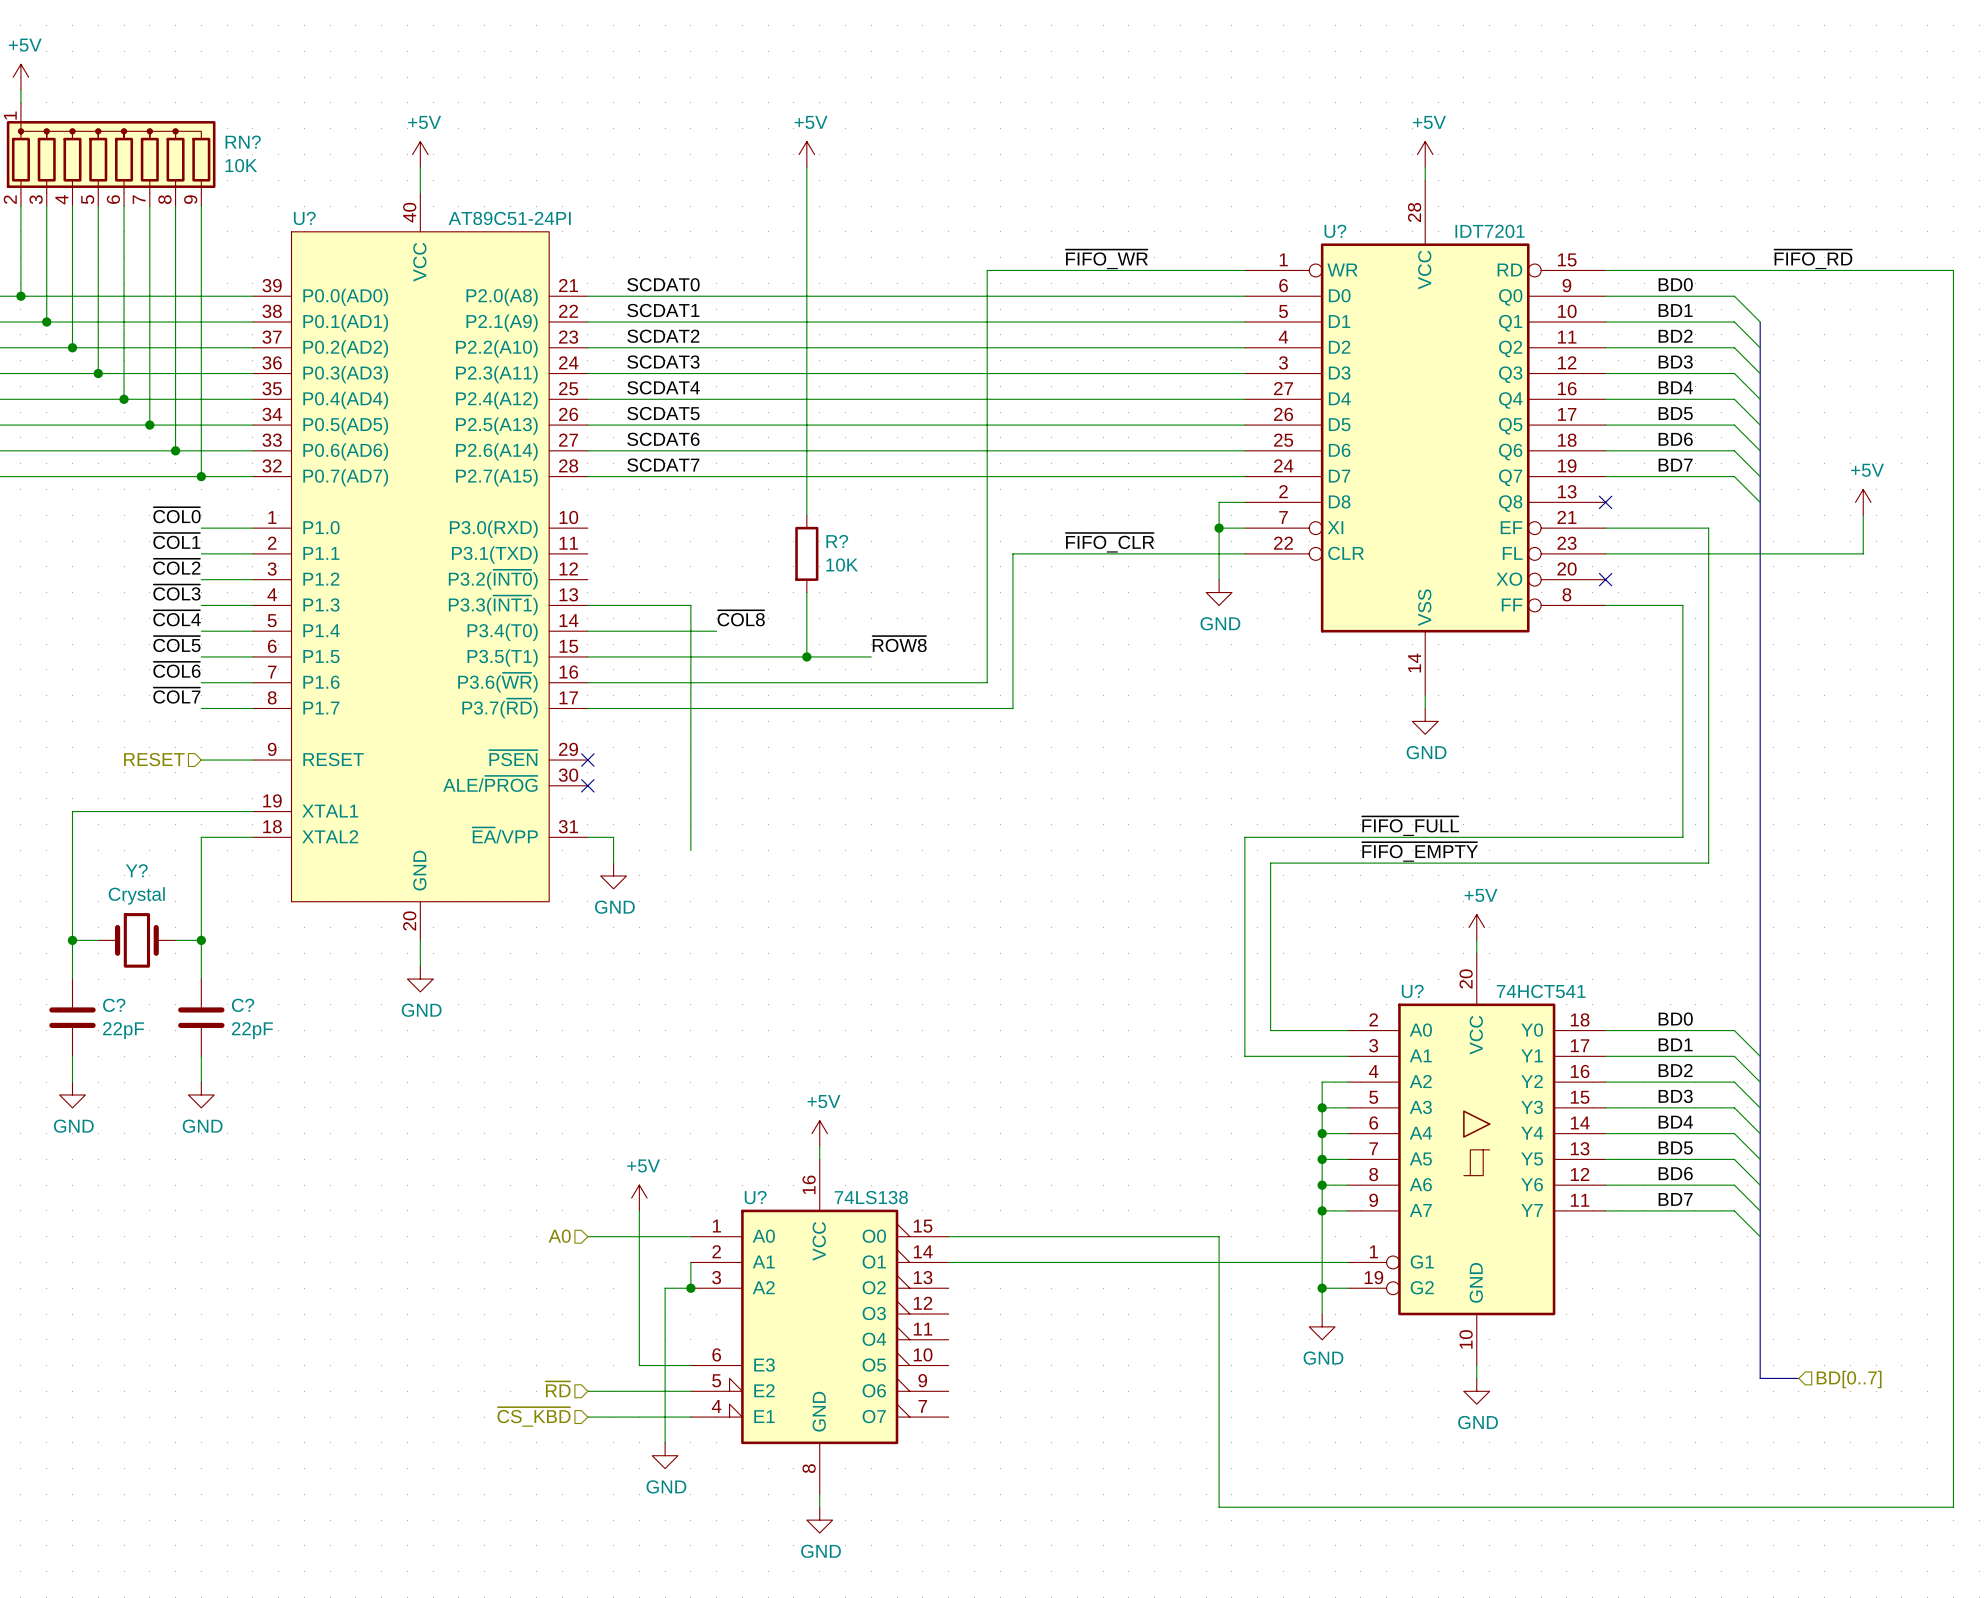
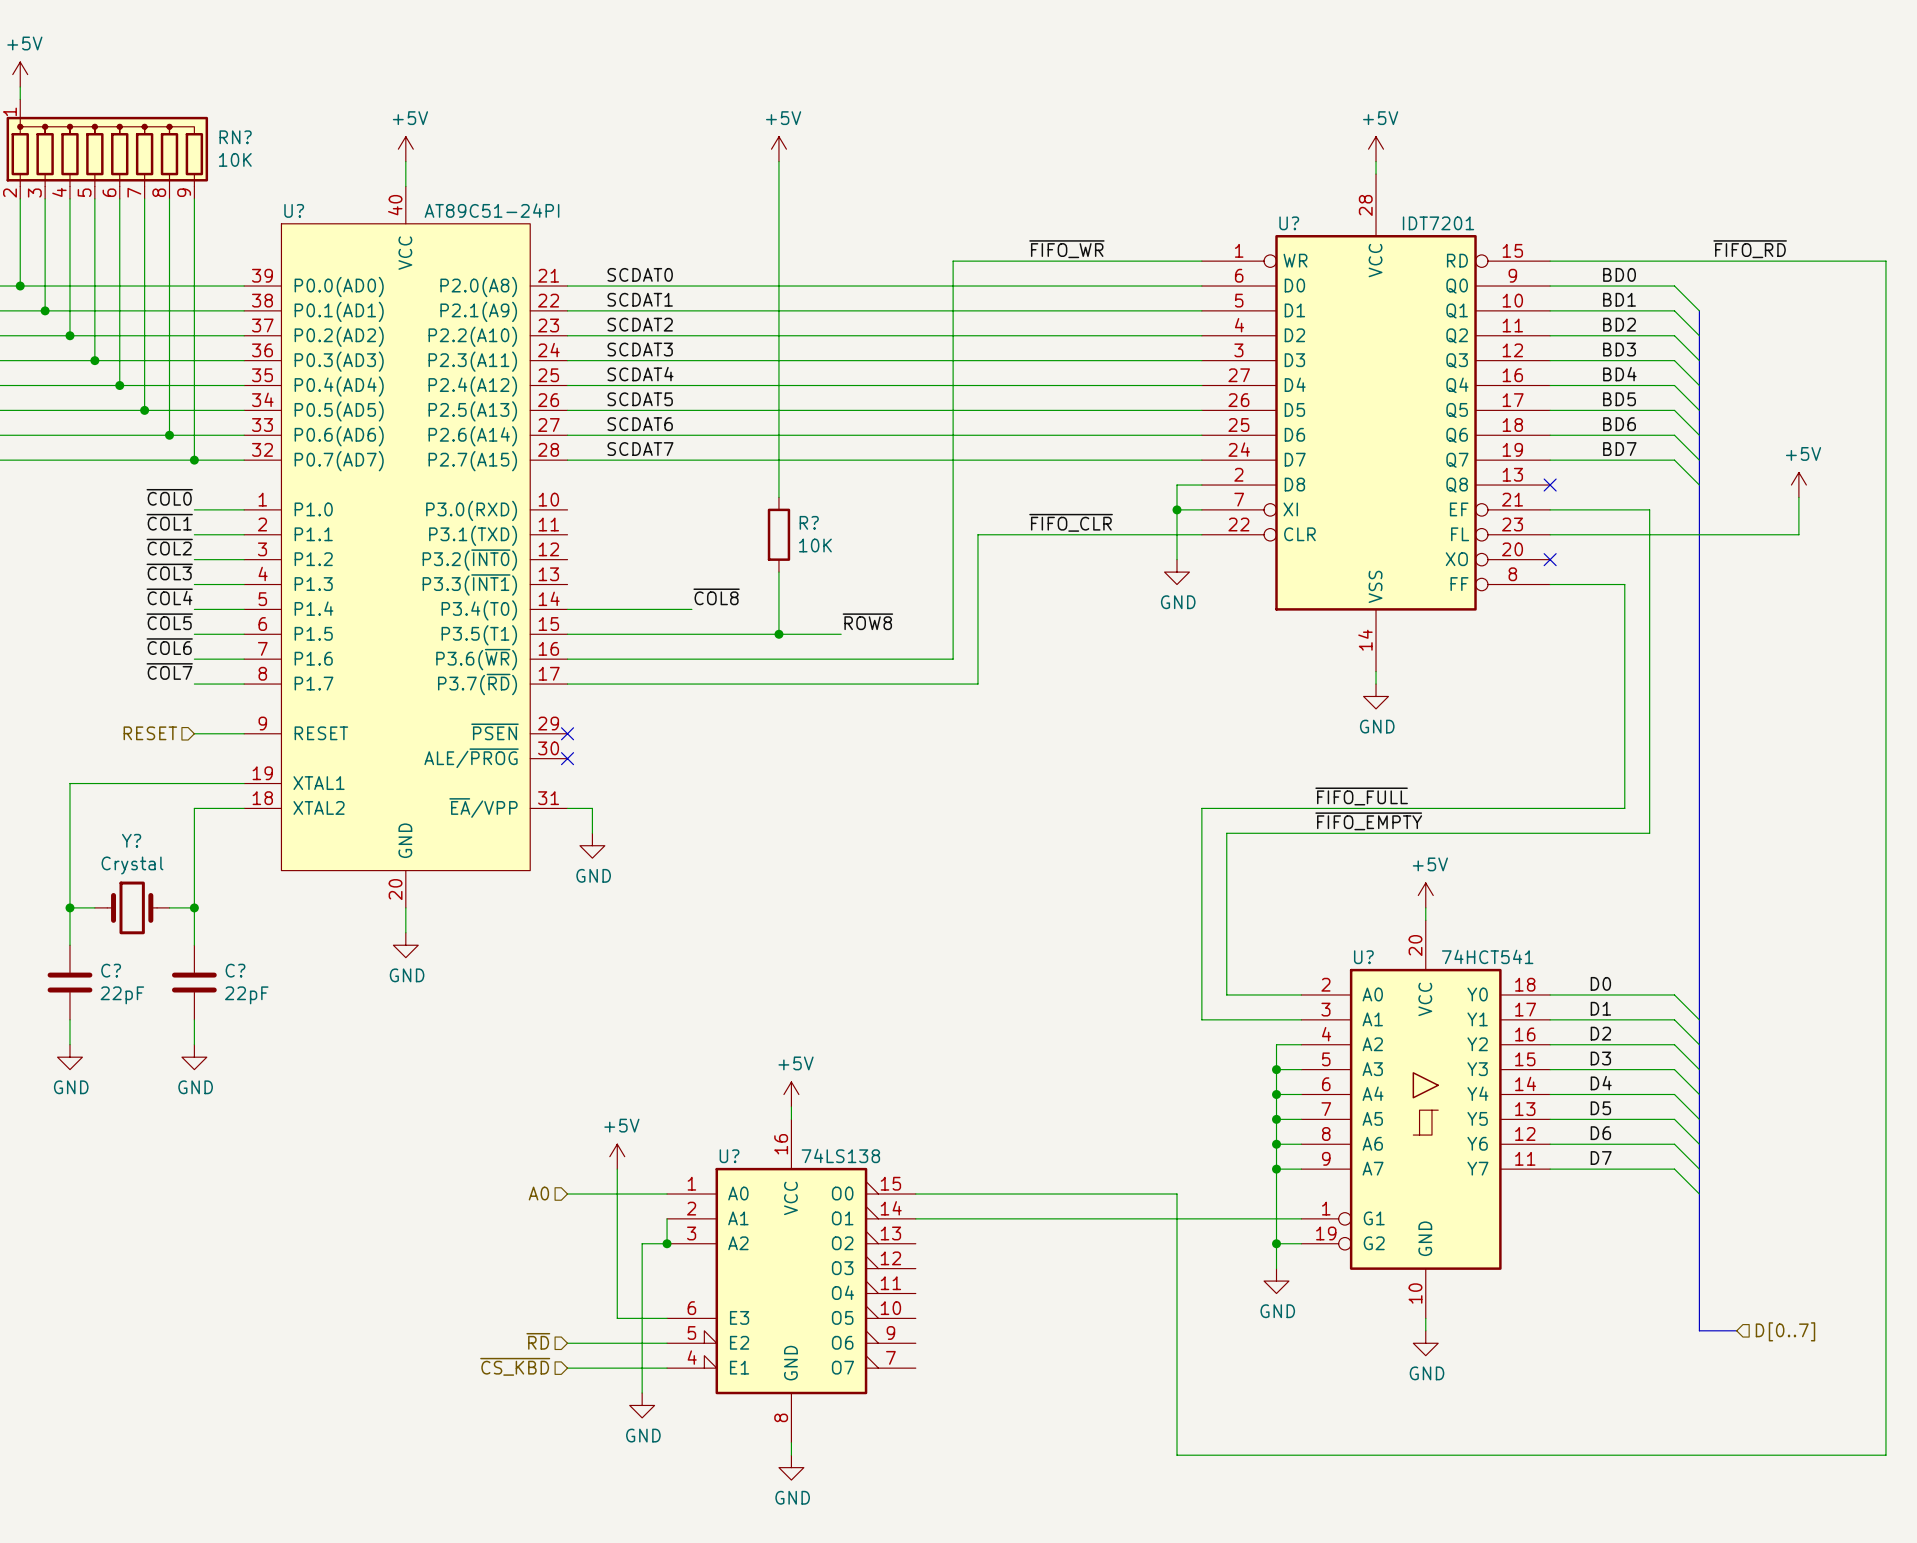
wire: (587, 605) (690, 605) (690, 850) -> none
label: BD0 (1675, 1019) -> D0 (1600, 983)
label: BD1 (1675, 1044) -> D1 (1600, 1008)
label: BD2 (1675, 1070) -> D2 (1600, 1033)
label: BD3 (1675, 1096) -> D3 (1600, 1058)
label: BD4 (1675, 1122) -> D4 (1601, 1083)
label: BD5 (1675, 1148) -> D5 (1600, 1108)
label: BD6 (1675, 1173) -> D6 (1600, 1133)
label: BD7 (1675, 1199) -> D7 (1601, 1158)
hierarchical label: BD[0..7] (1849, 1379) -> D[0..7] (1785, 1331)

